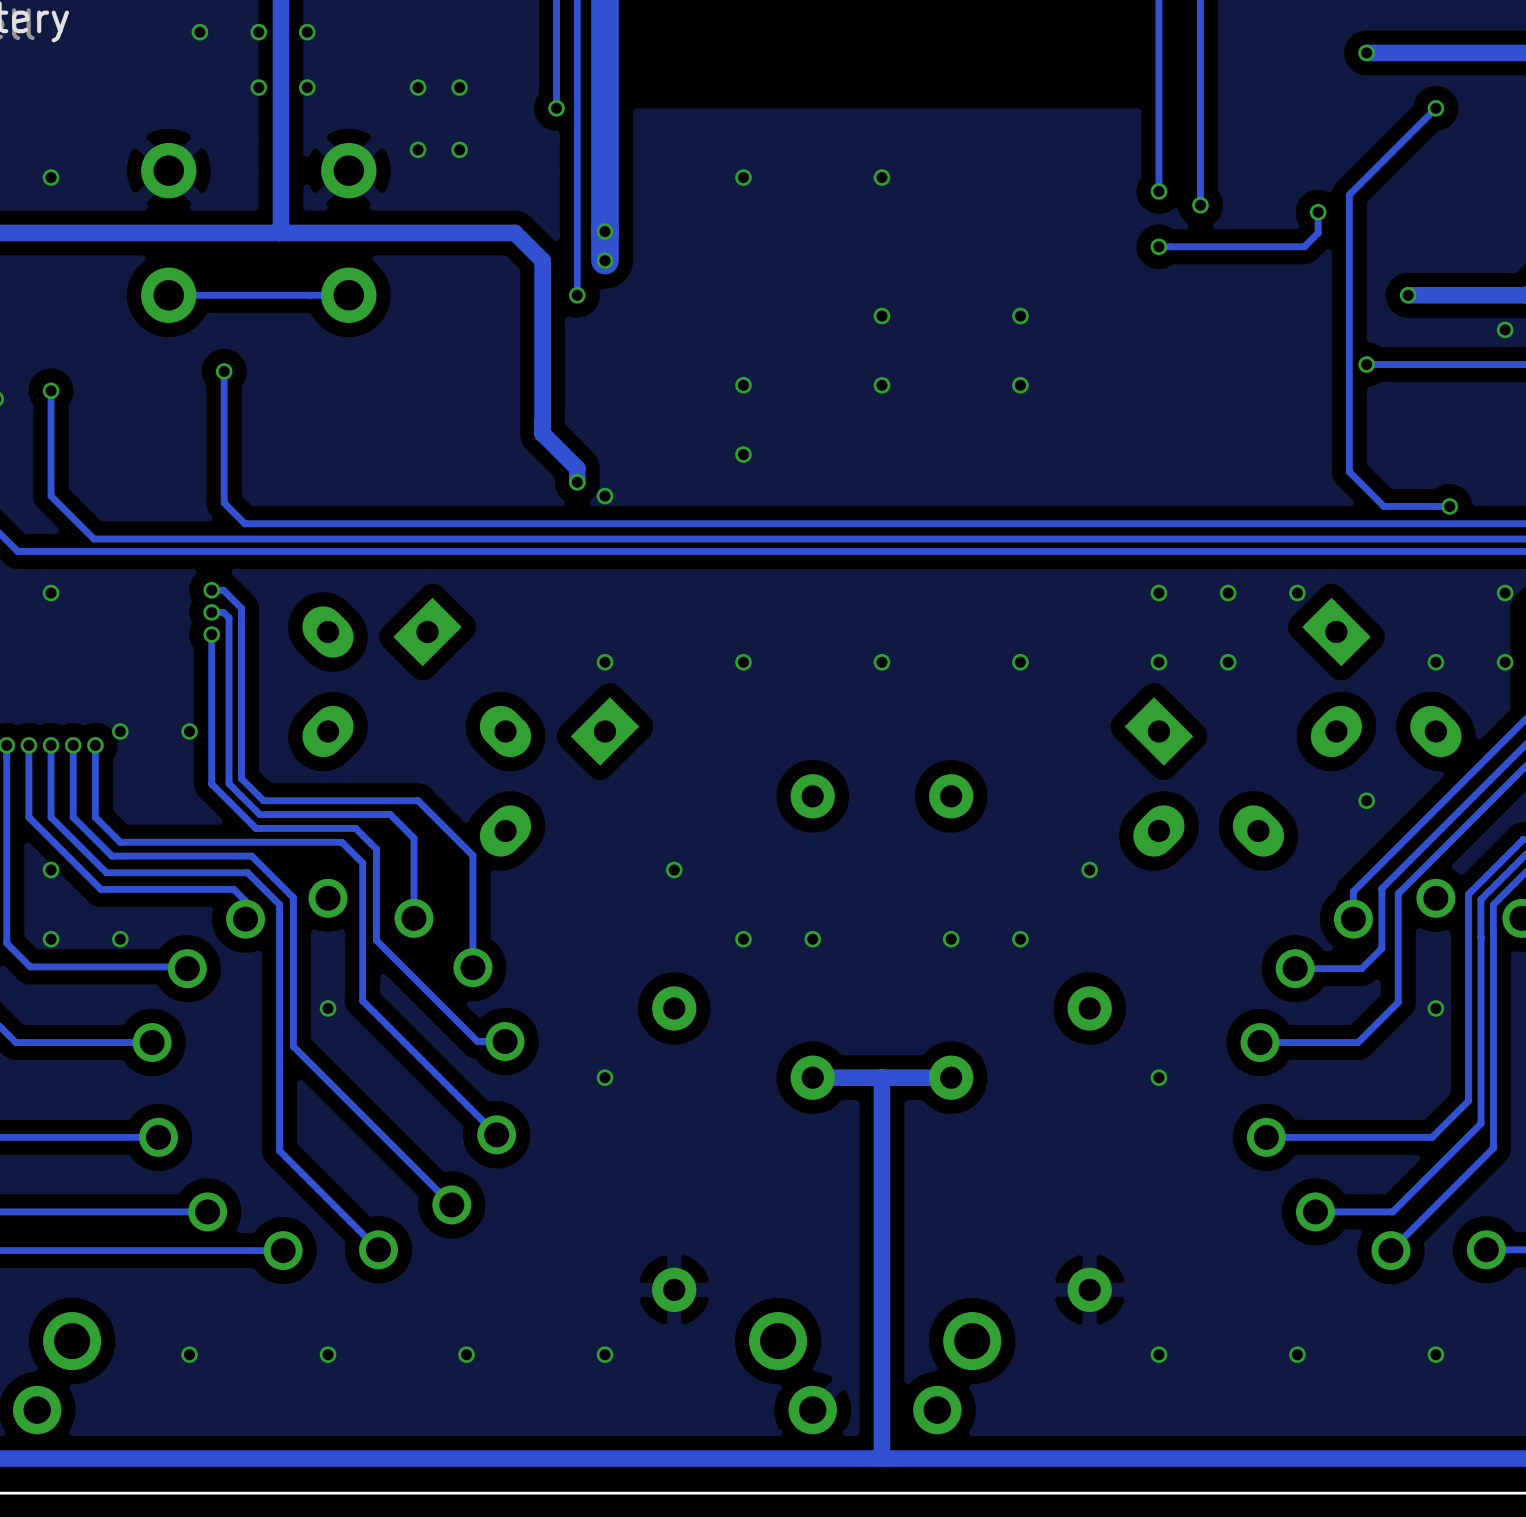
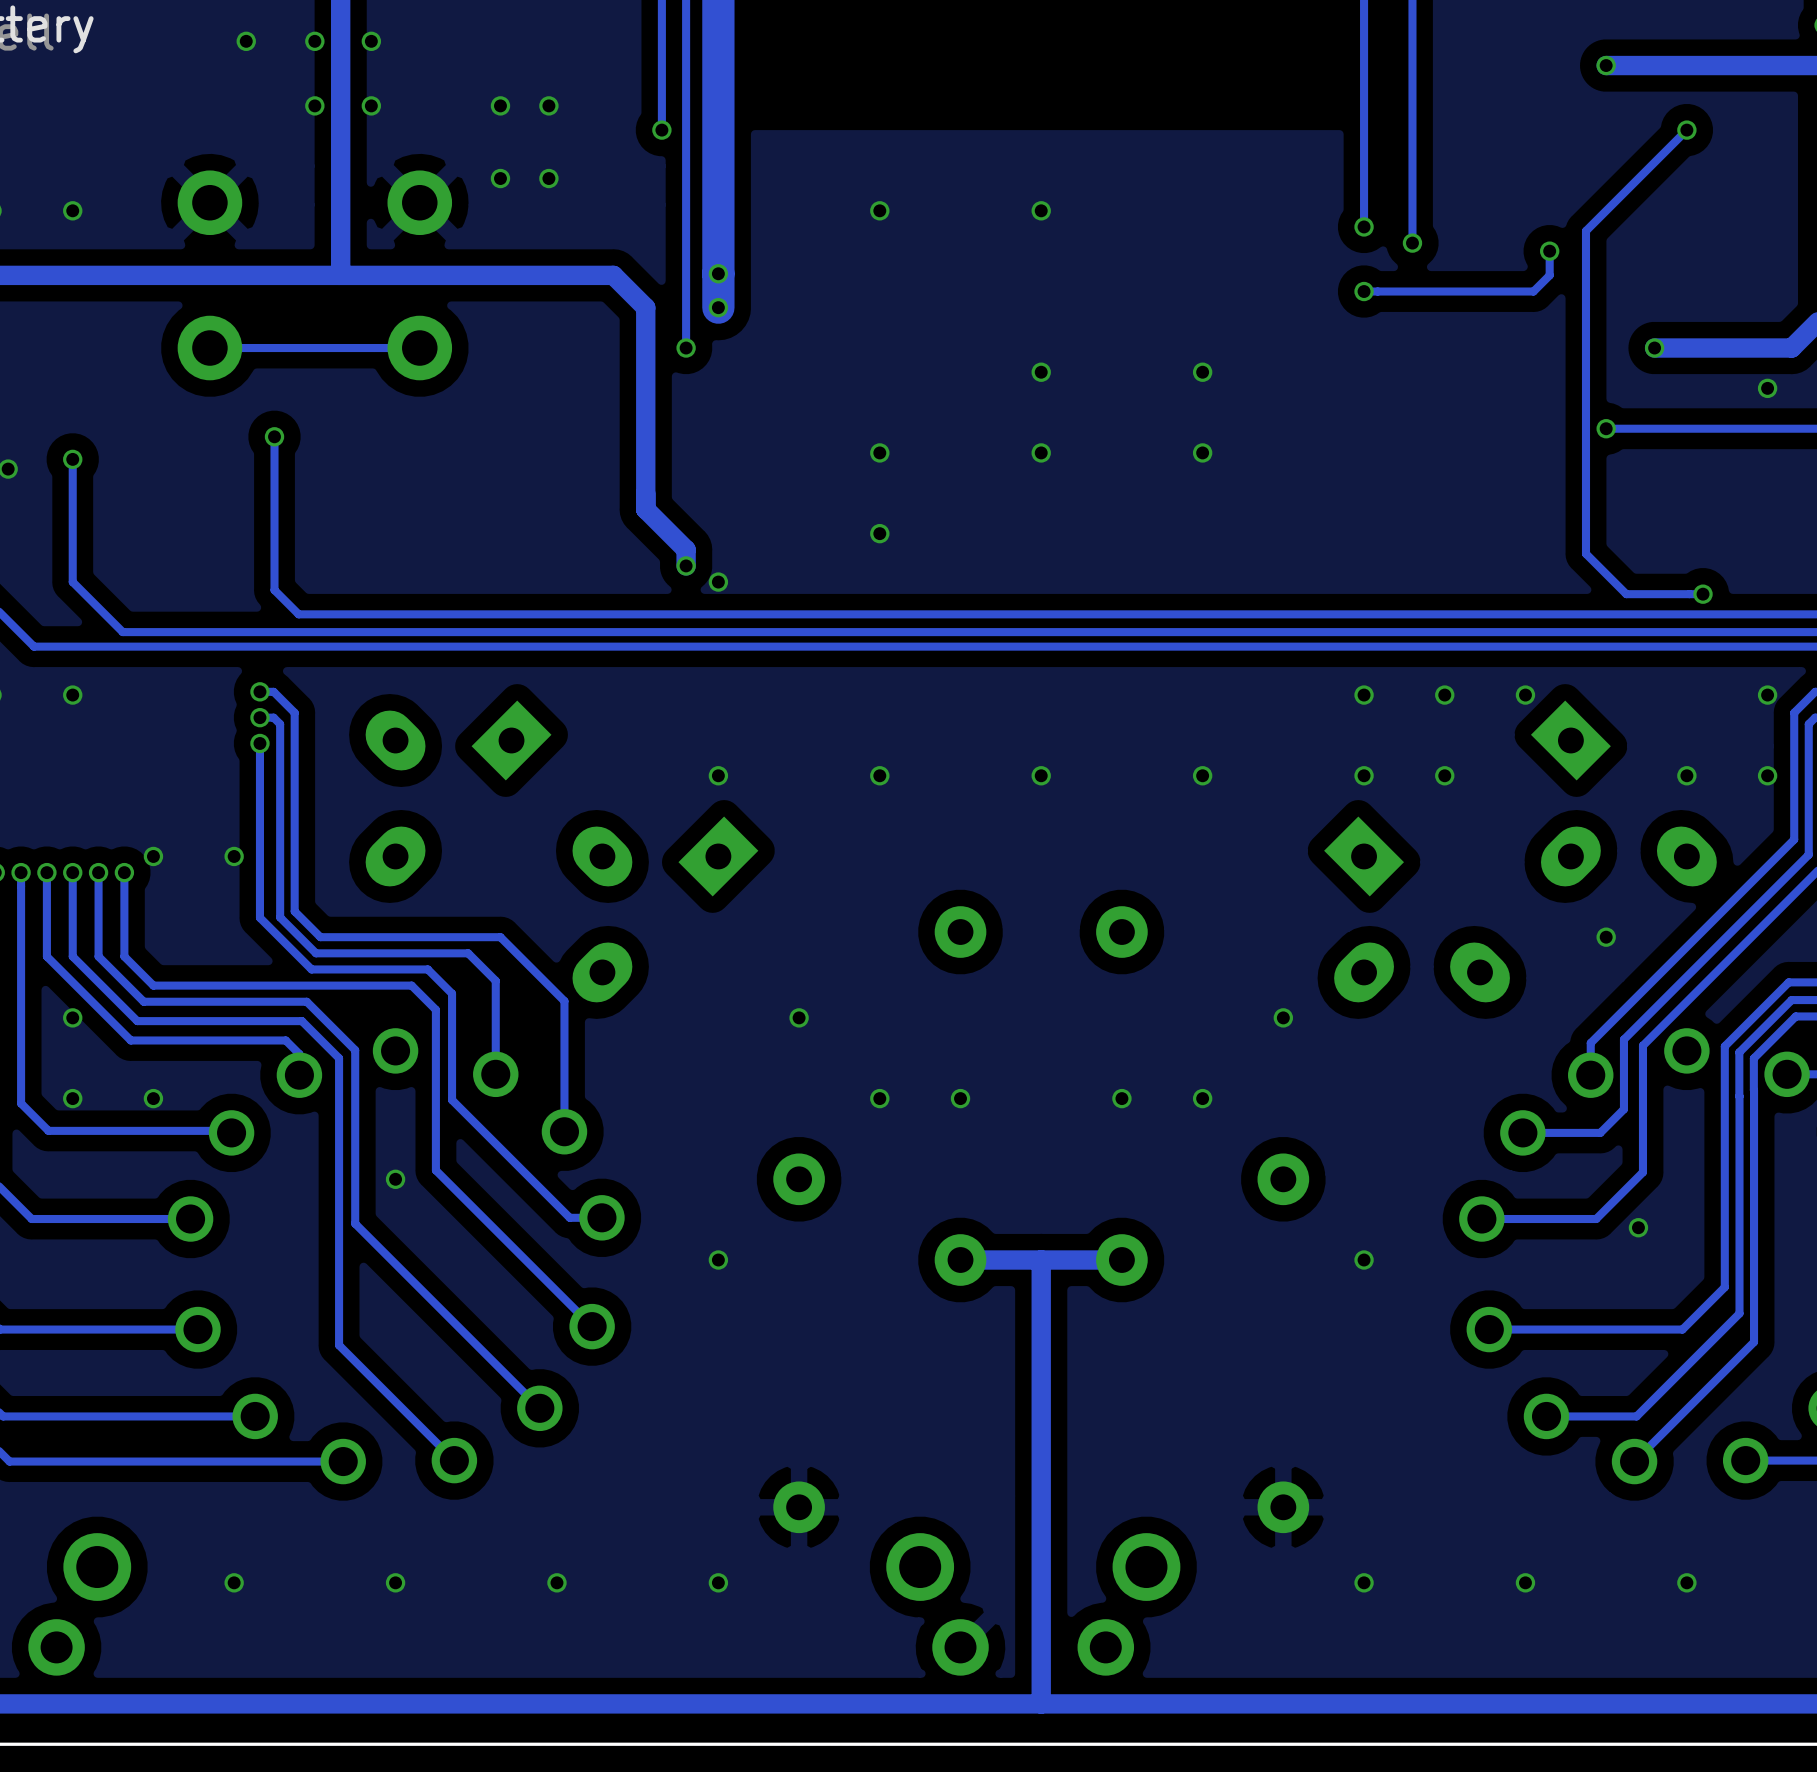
via position: (1435, 1008) -> (1638, 1227)

